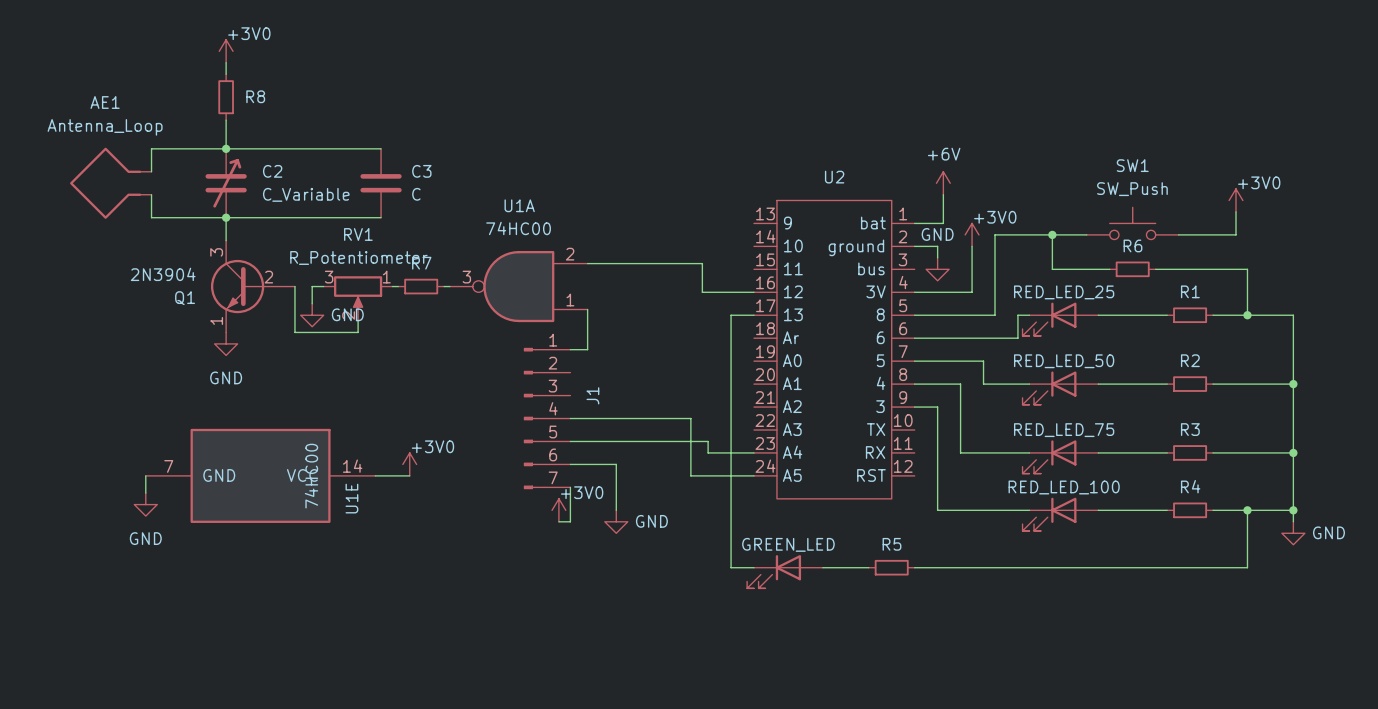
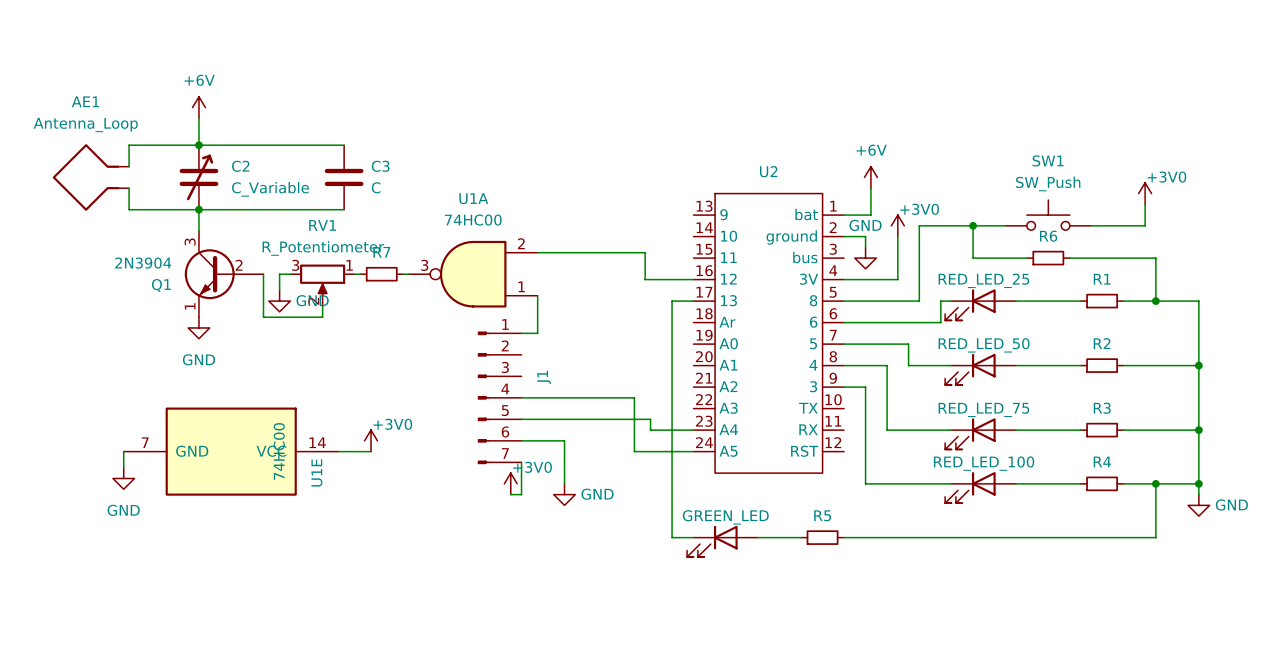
power symbol: +3V0 (226, 51) -> none
wire: (226, 62) (226, 74) -> none
R8: (226, 97) -> none
power symbol: none -> +6V (198, 107)

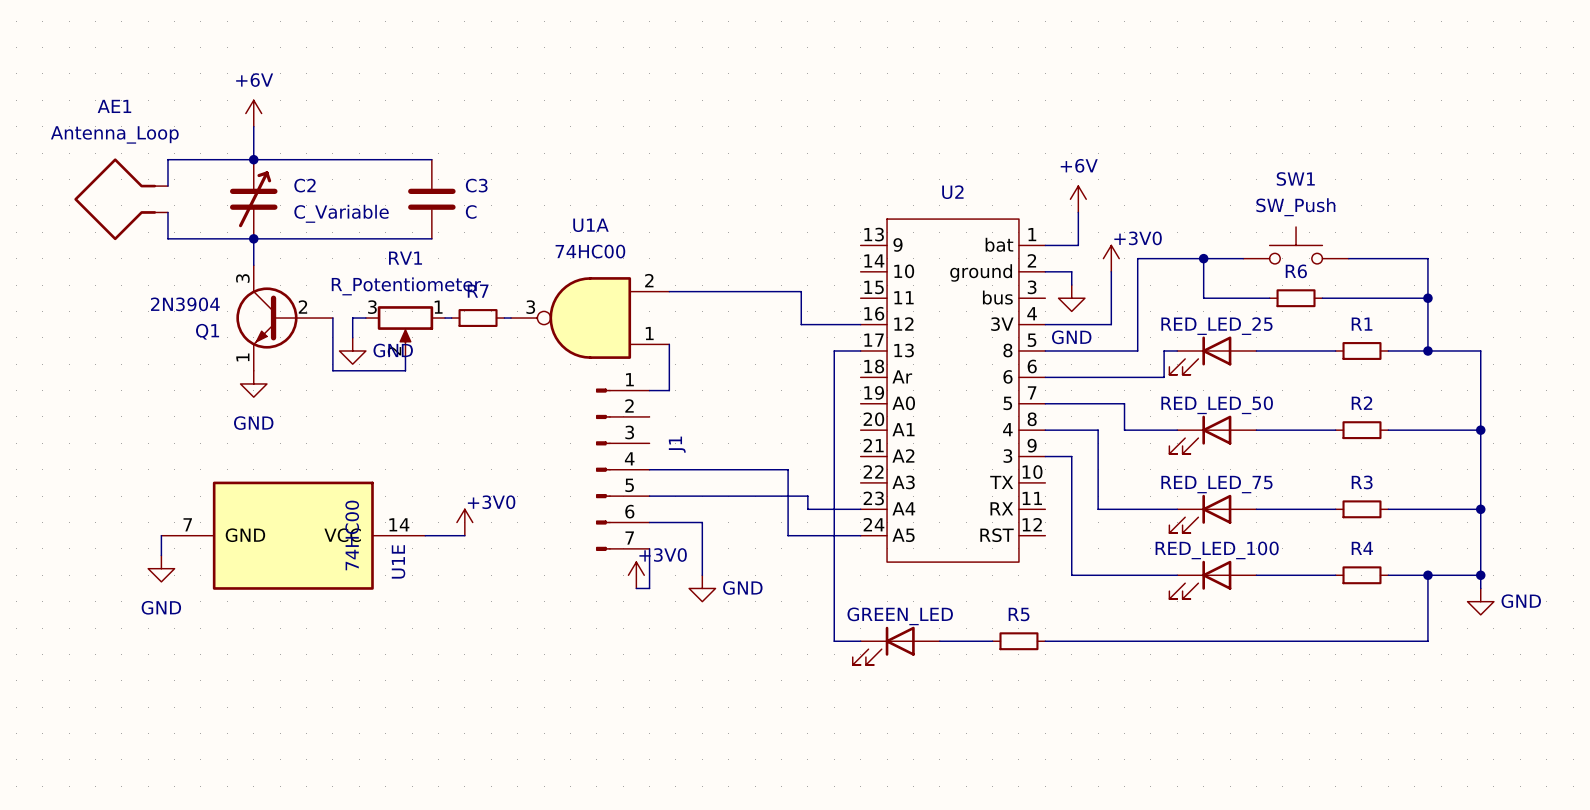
power symbol: +3V0 (1145, 193) -> none
wire: (1145, 204) (1145, 225) -> (1427, 298) (1427, 258) (1414, 258)
power symbol text position: GND (865, 225) -> GND (1071, 337)
junction: none -> (1427, 298)

